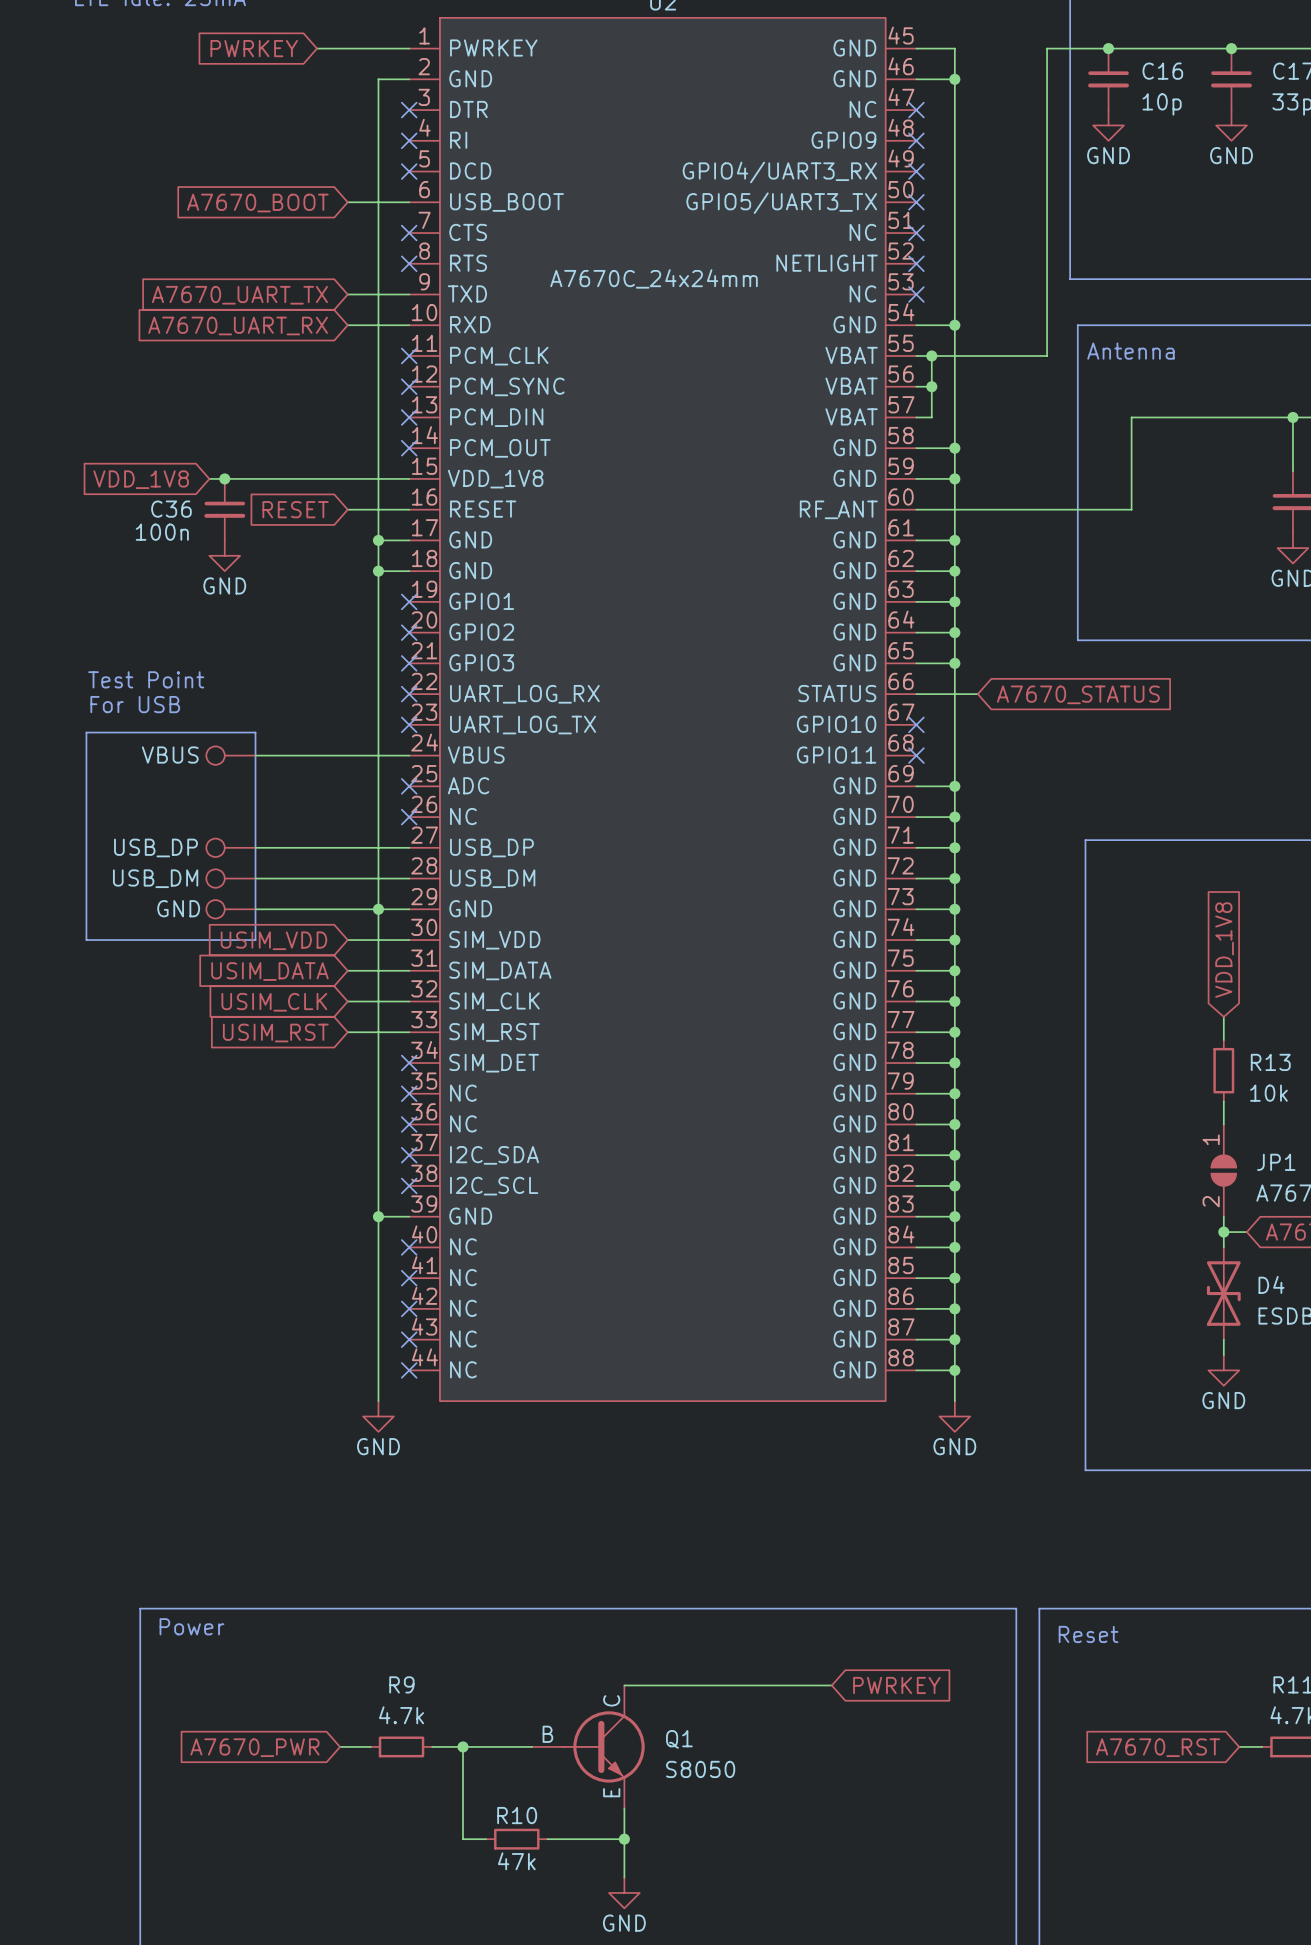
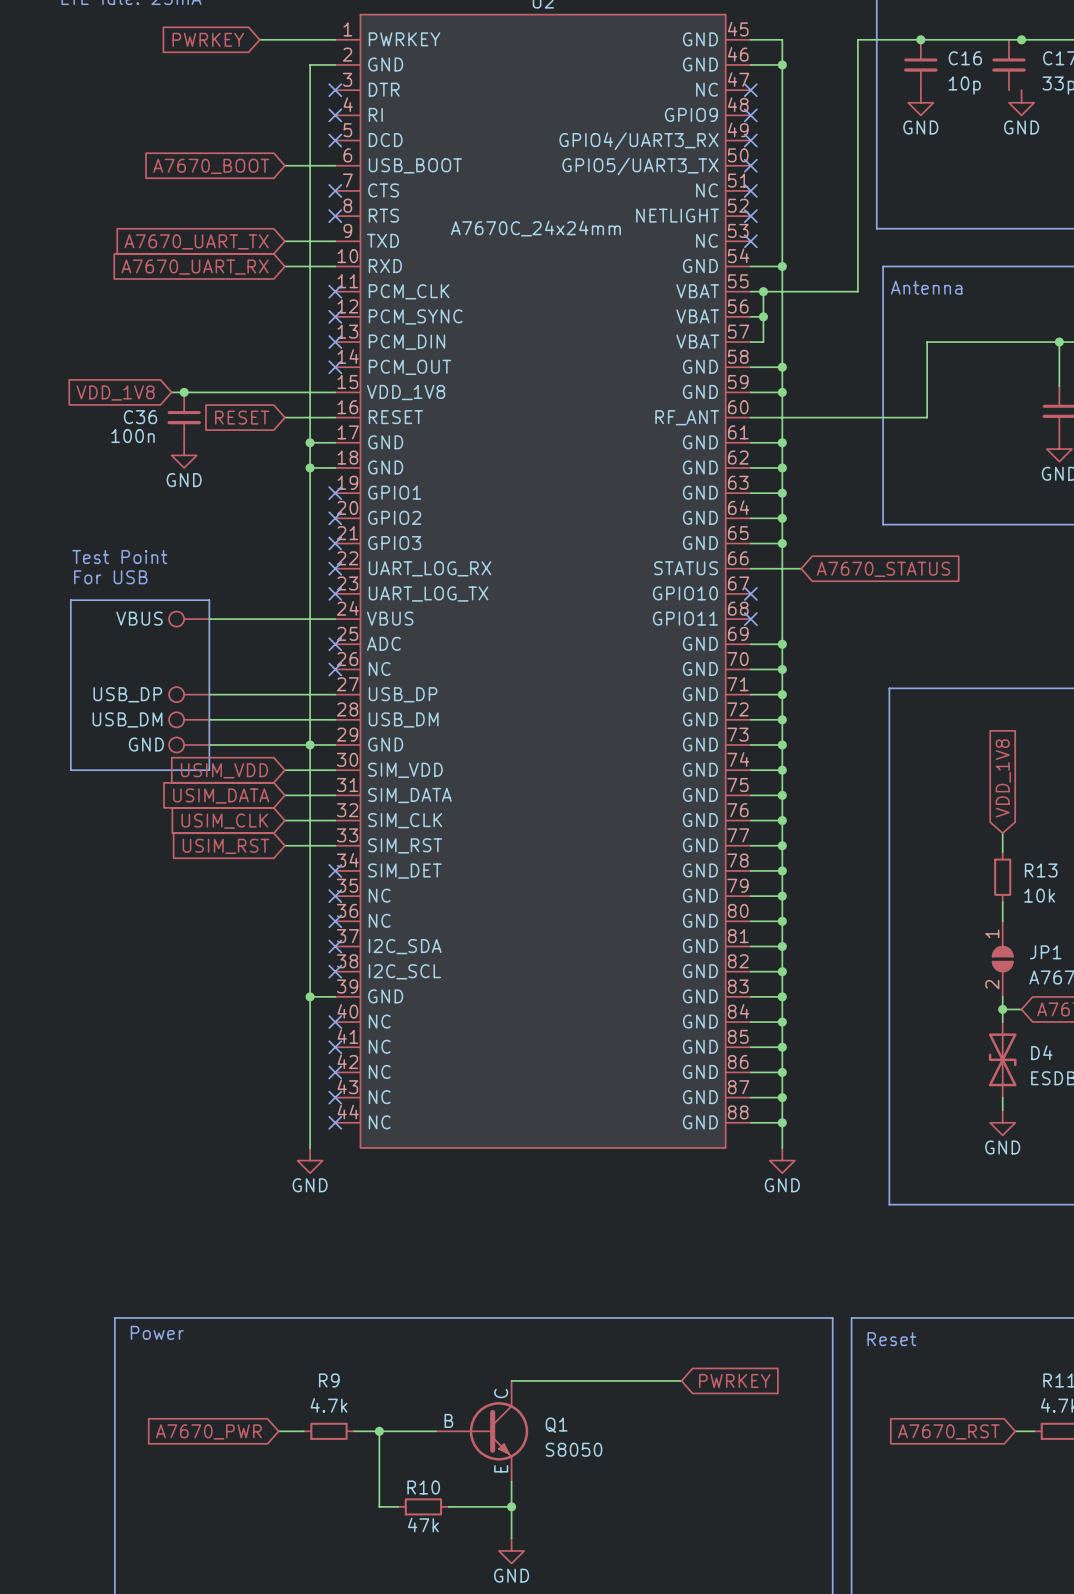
junction position: (1108, 48) -> (920, 39)
junction position: (1231, 48) -> (1021, 39)
C16 position: (1108, 79) -> (920, 64)
power symbol position: GND (1108, 125) -> GND (920, 102)
power symbol position: GND (1231, 125) -> GND (1021, 102)

